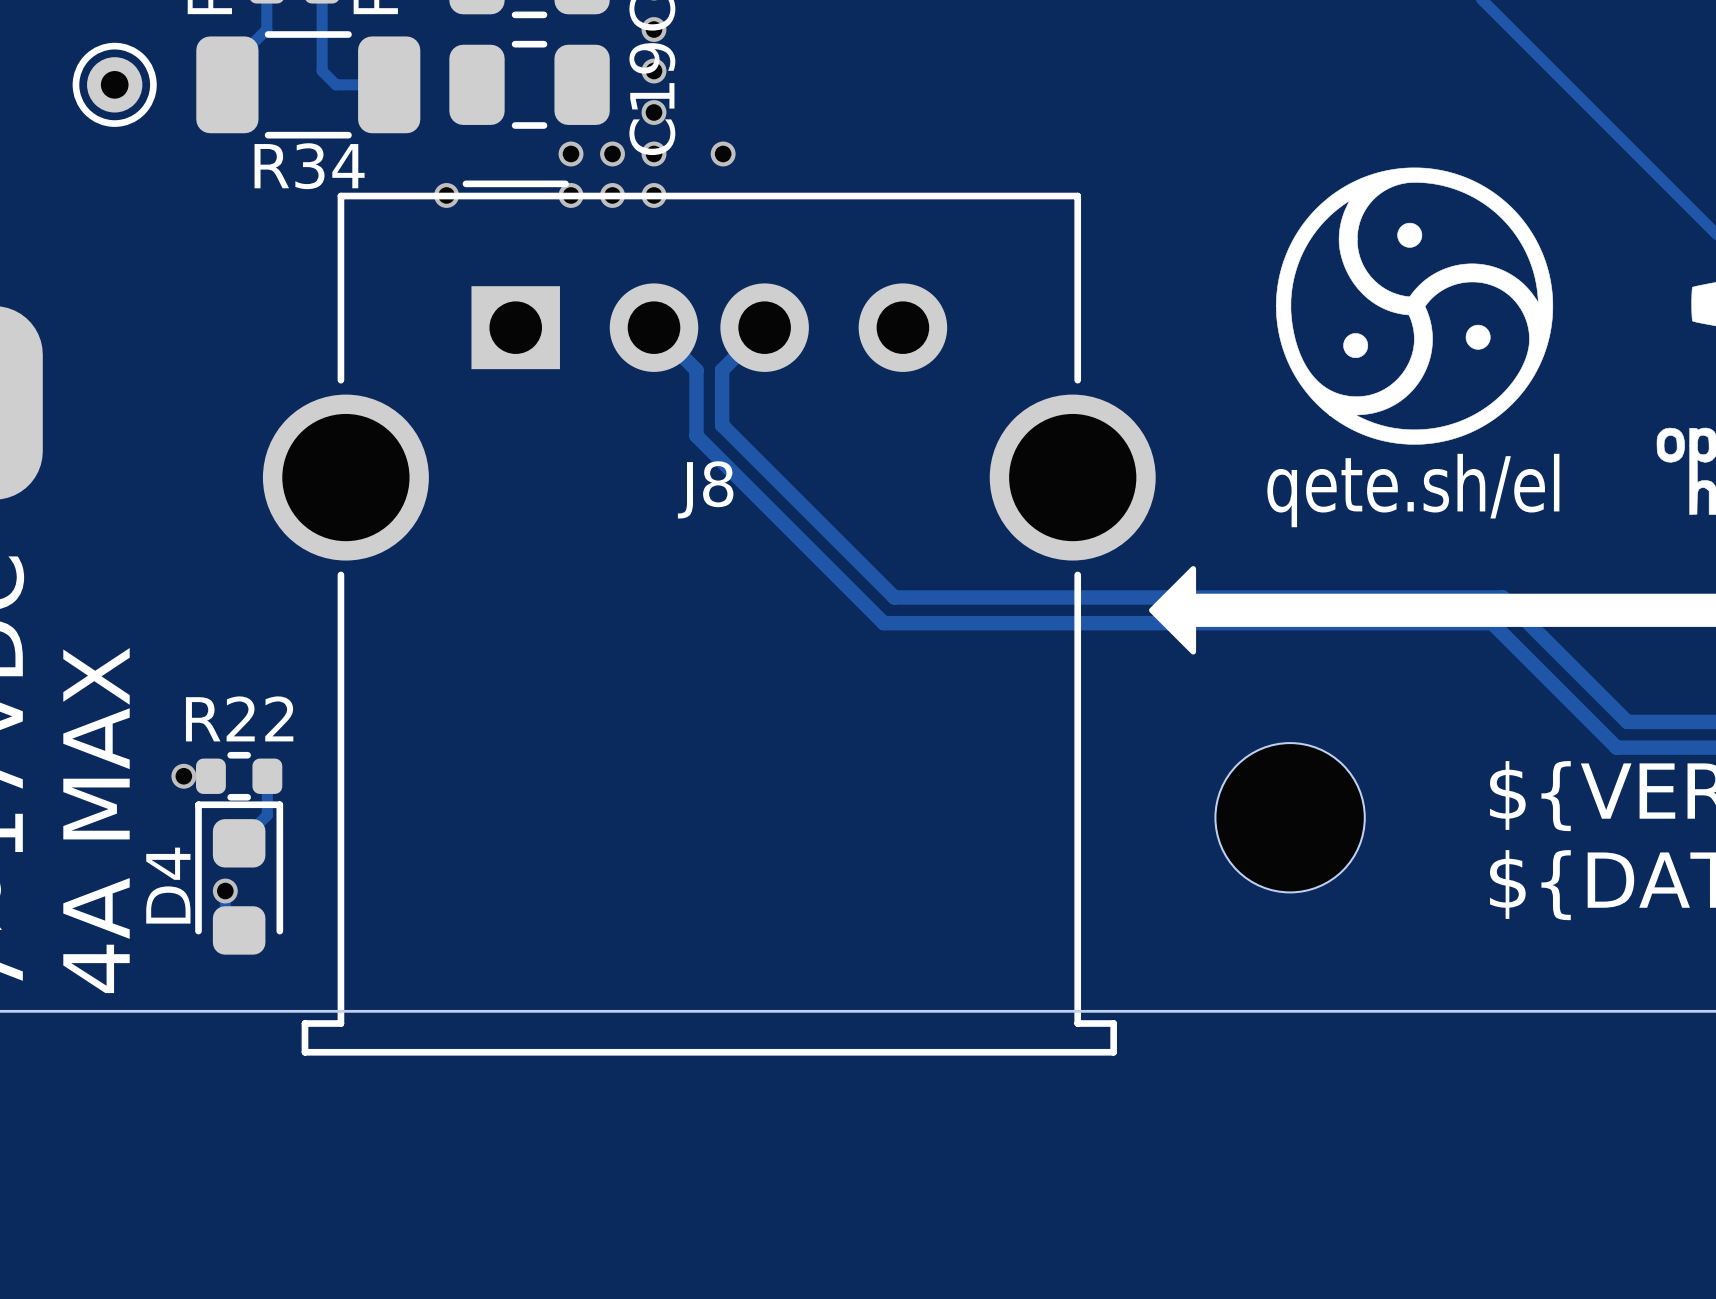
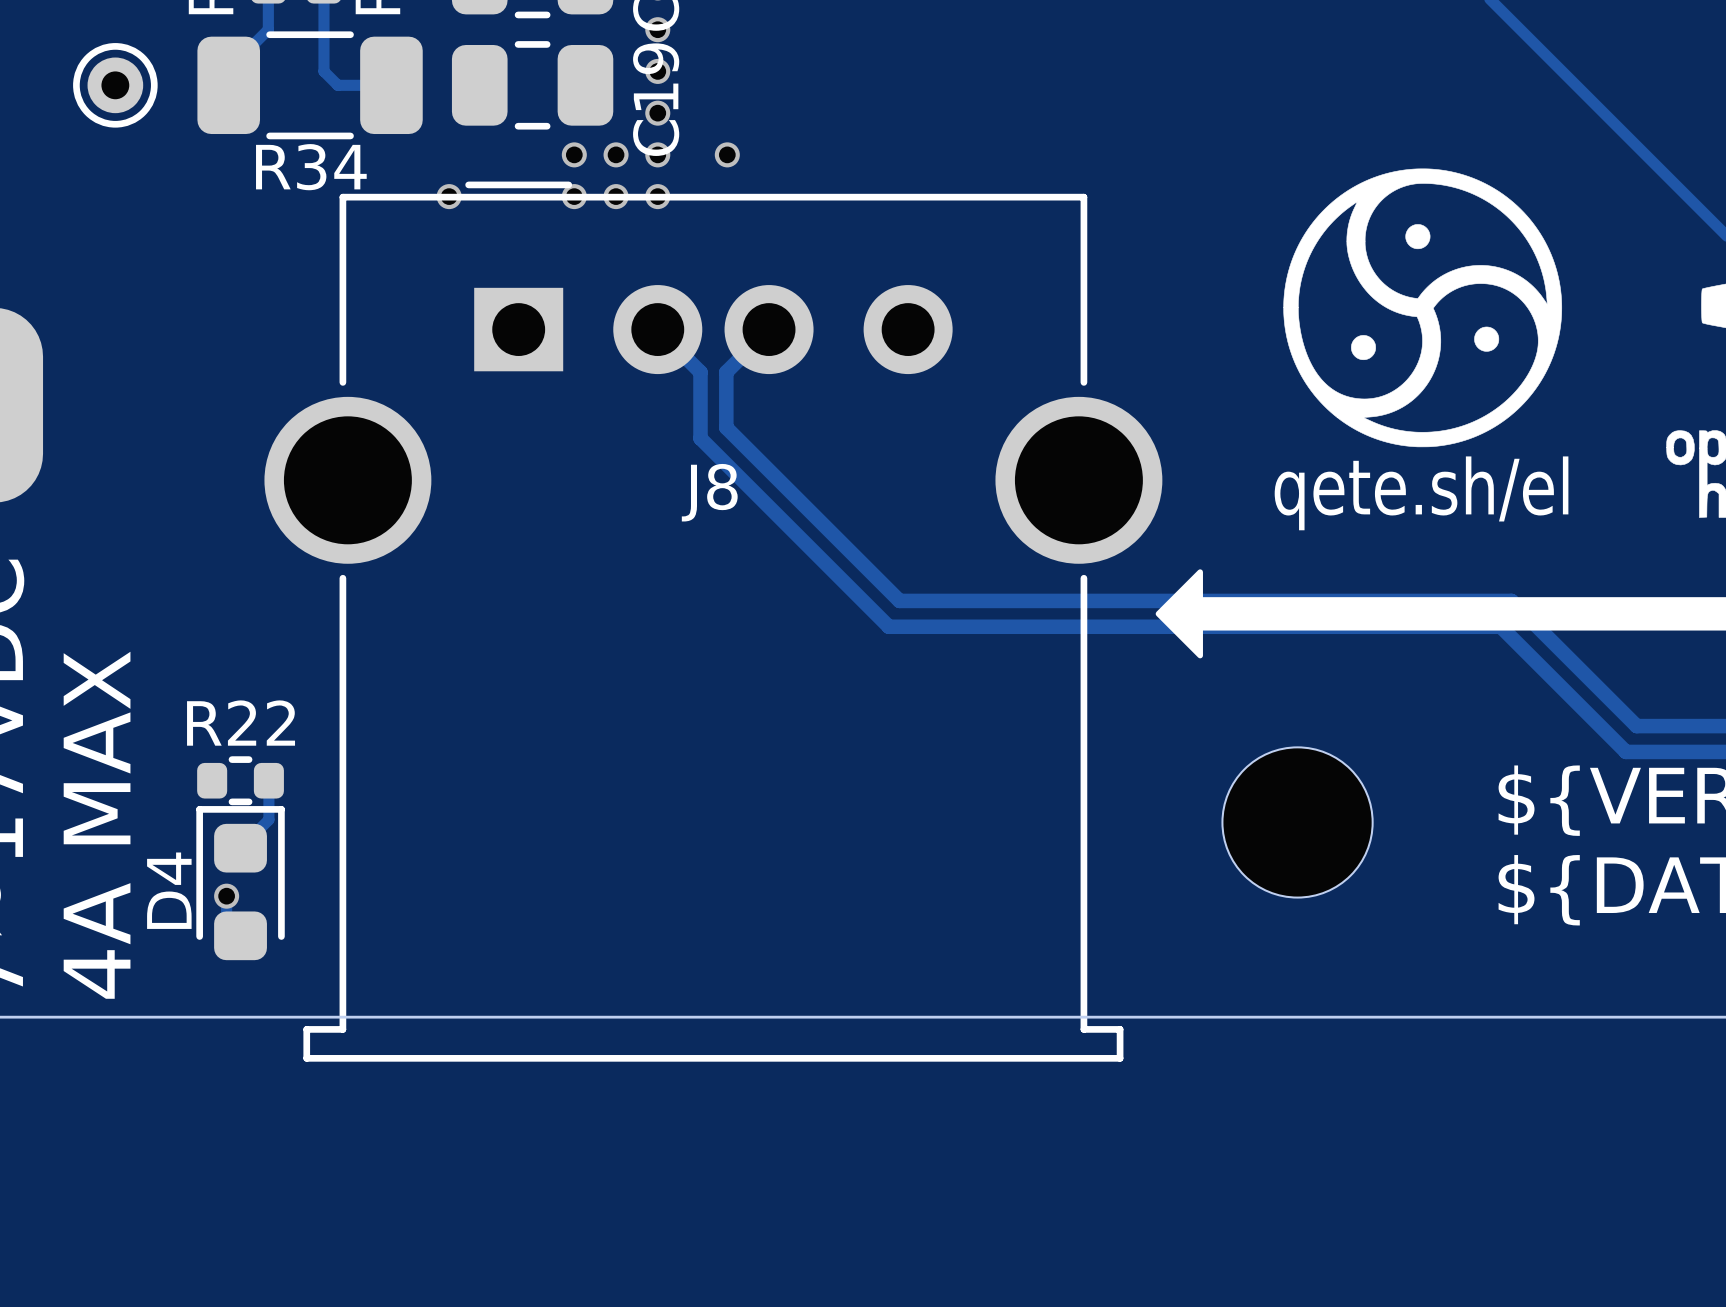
via: (183, 776) -> none

